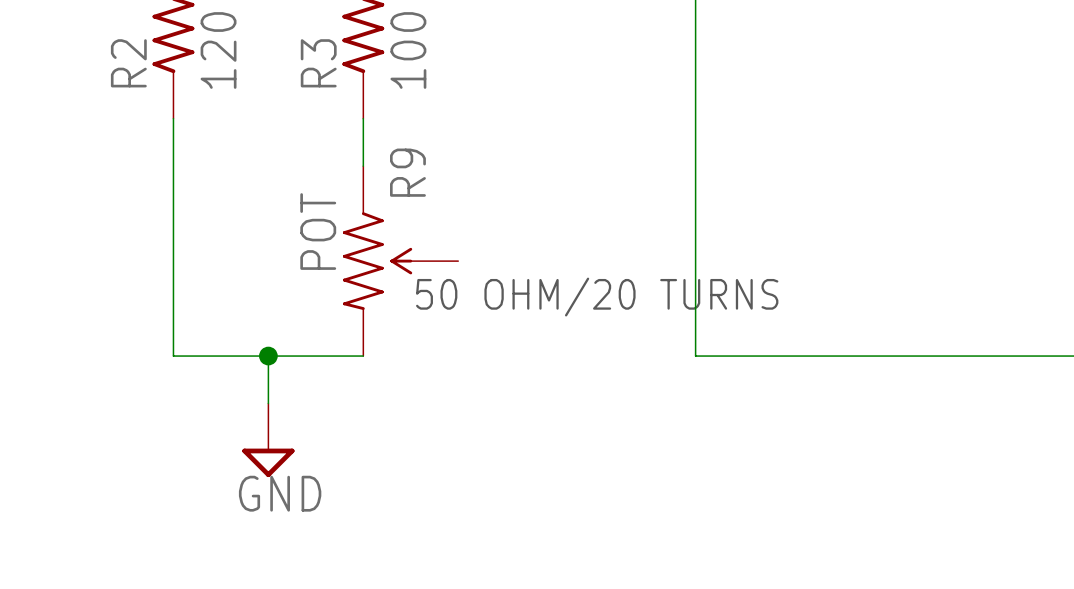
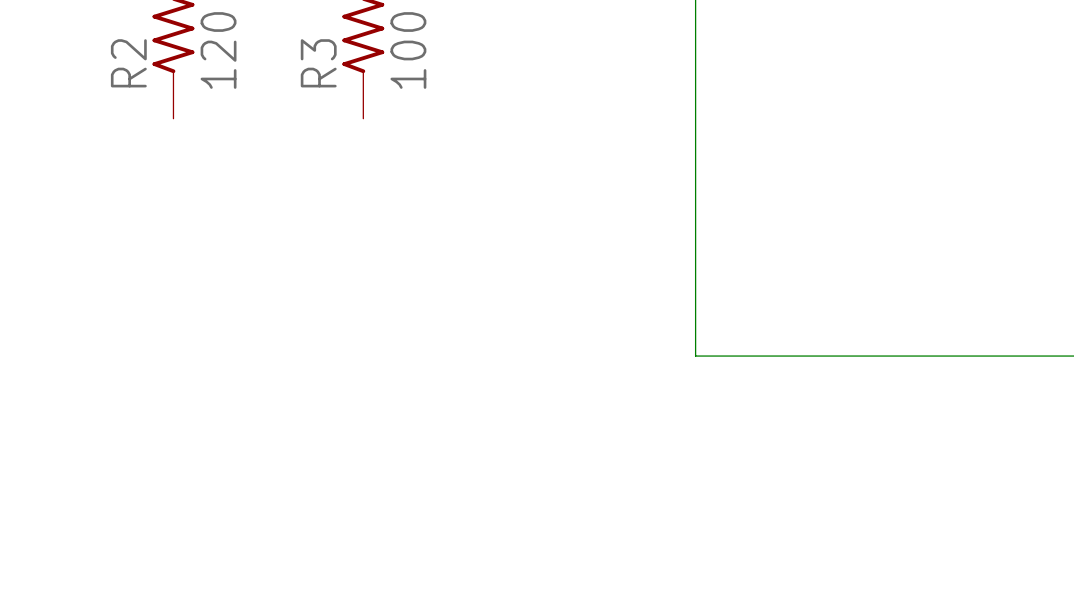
wire: (173, 118) (173, 356) (363, 356) -> none
wire: (363, 118) (363, 166) -> none
R9: POT (400, 261) -> none
text: 50 OHM/20 TURNS (597, 297) -> none
wire: (268, 356) (268, 403) -> none
junction: (268, 356) -> none
power symbol: GND (268, 440) -> none

